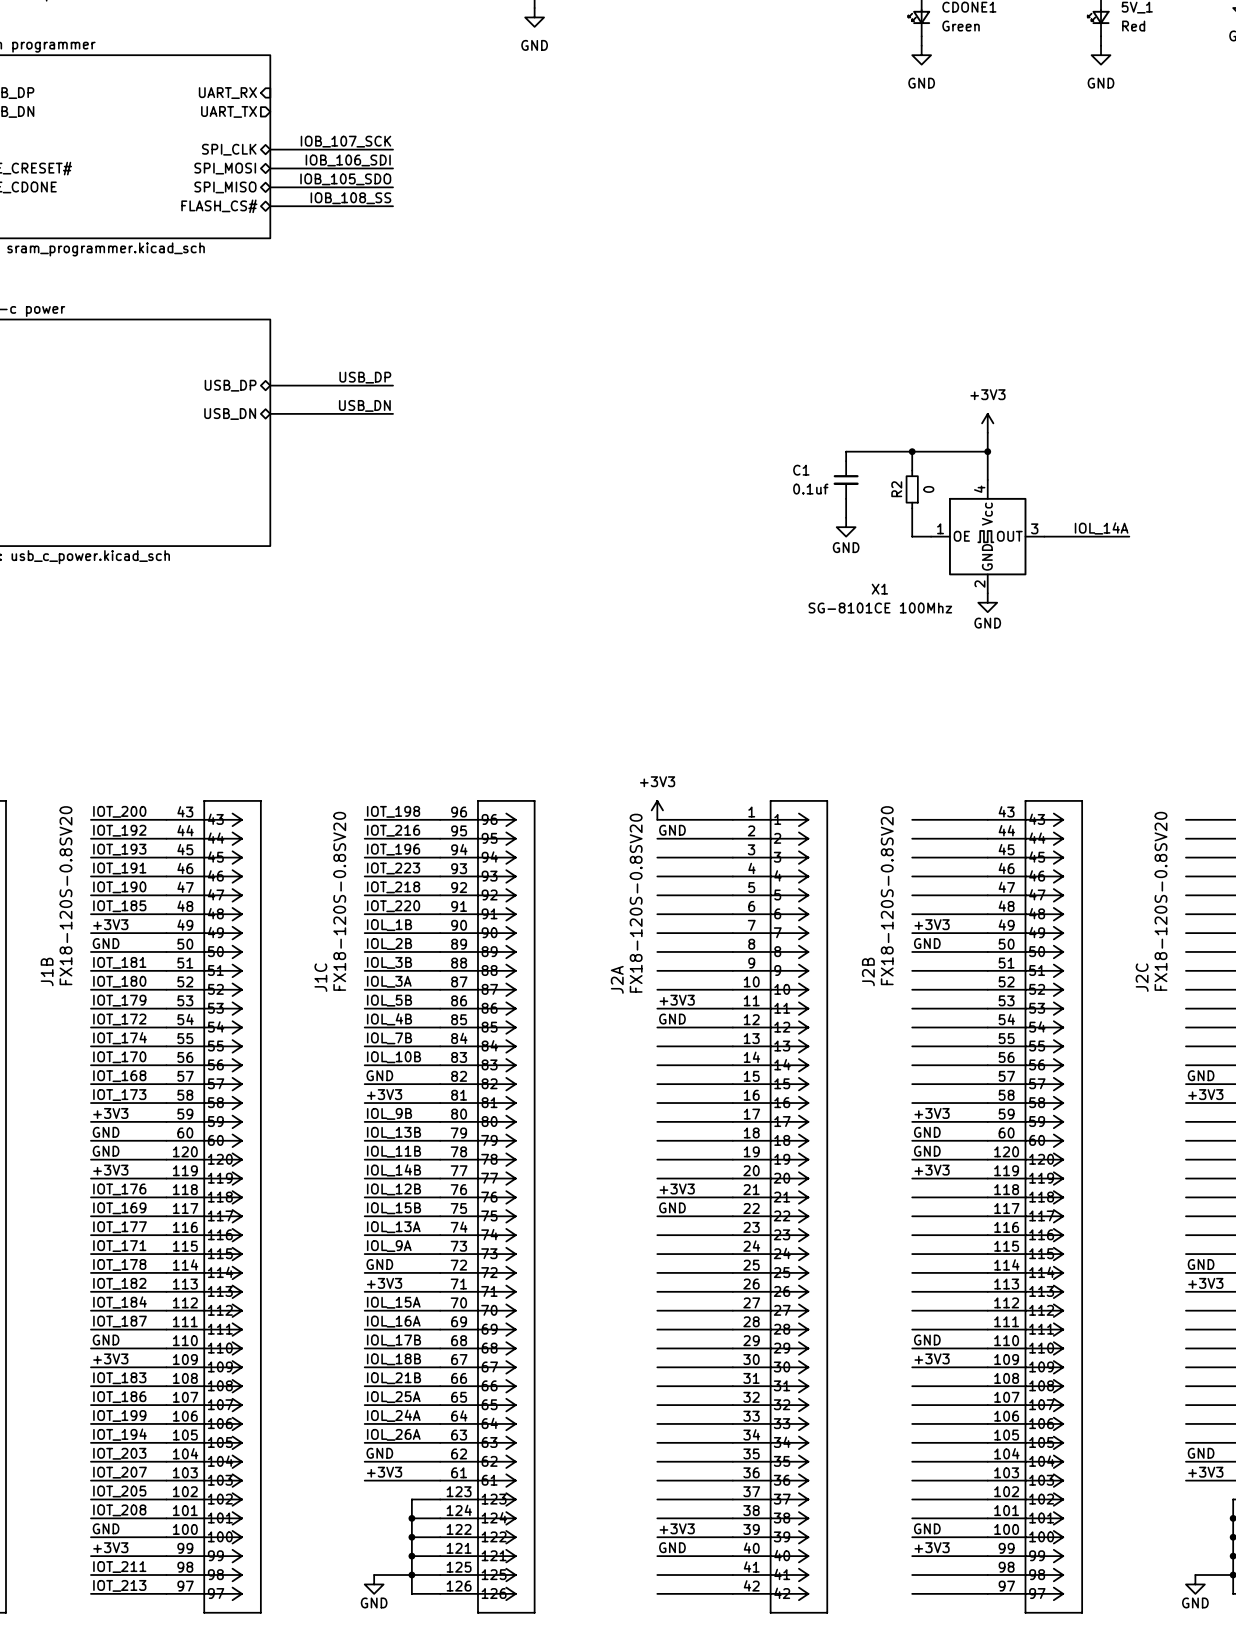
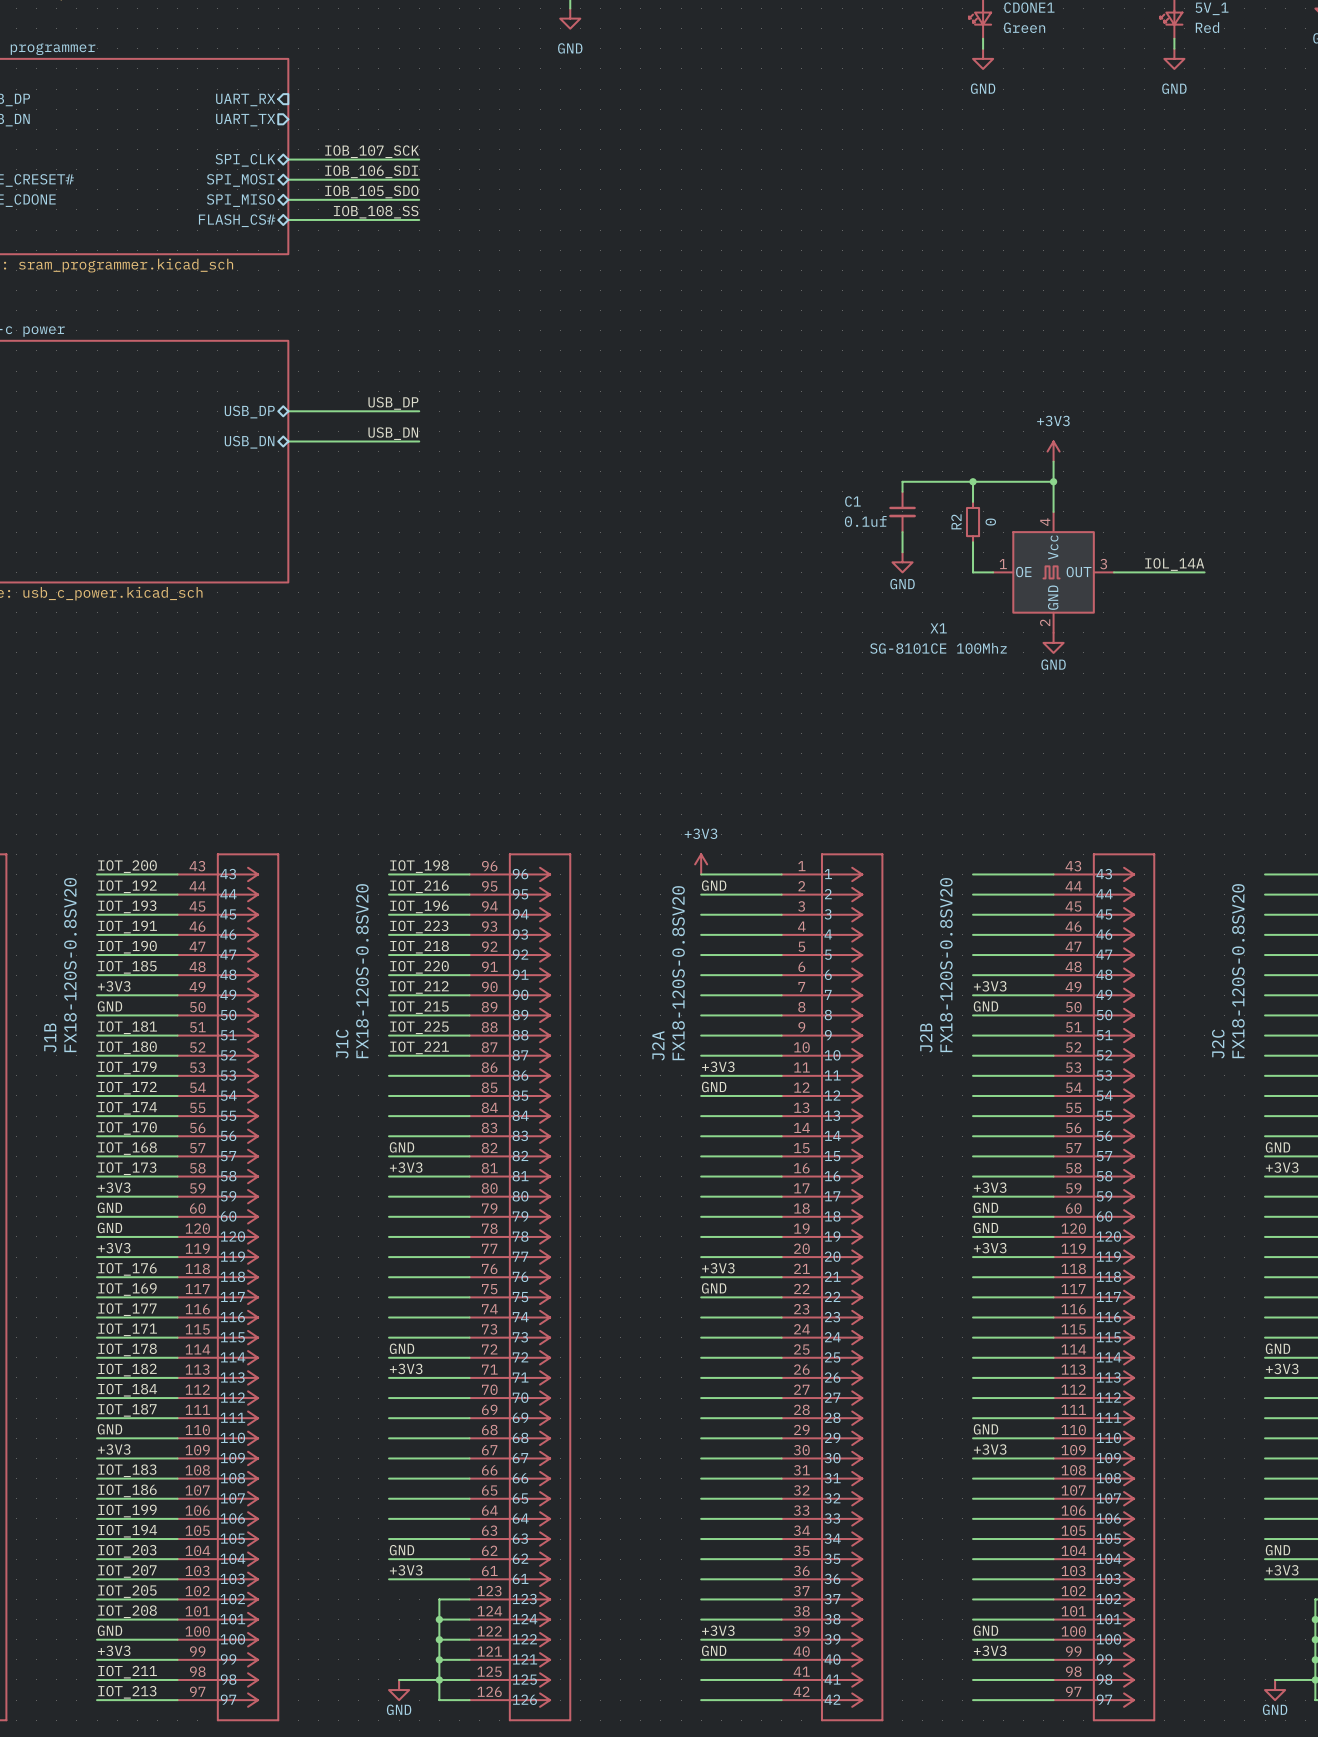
label: IOL_1B (389, 925) -> IOT_212 (419, 987)
label: IOL_2B (389, 944) -> IOT_215 (419, 1007)
label: IOL_3B (389, 962) -> IOT_225 (419, 1027)
label: IOL_3A (389, 981) -> IOT_221 (419, 1047)
label: IOL_5B (389, 1000) -> none
label: IOL_4B (389, 1019) -> none
label: IOL_7B (389, 1038) -> none
label: IOL_10B (393, 1057) -> none
label: IOL_9B (389, 1113) -> none
label: IOL_13B (393, 1132) -> none
label: IOL_11B (393, 1151) -> none
label: IOL_14B (393, 1170) -> none
label: IOL_12B (393, 1189) -> none
label: IOL_15B (393, 1208) -> none
label: IOL_13A (393, 1227) -> none
label: IOL_9A (389, 1246) -> none
label: IOL_15A (393, 1302) -> none
label: IOL_16A (393, 1321) -> none
label: IOL_17B (393, 1340) -> none
label: IOL_18B (393, 1359) -> none
label: IOL_21B (393, 1378) -> none
label: IOL_25A (393, 1397) -> none
label: IOL_24A (393, 1415) -> none
label: IOL_26A (393, 1434) -> none

